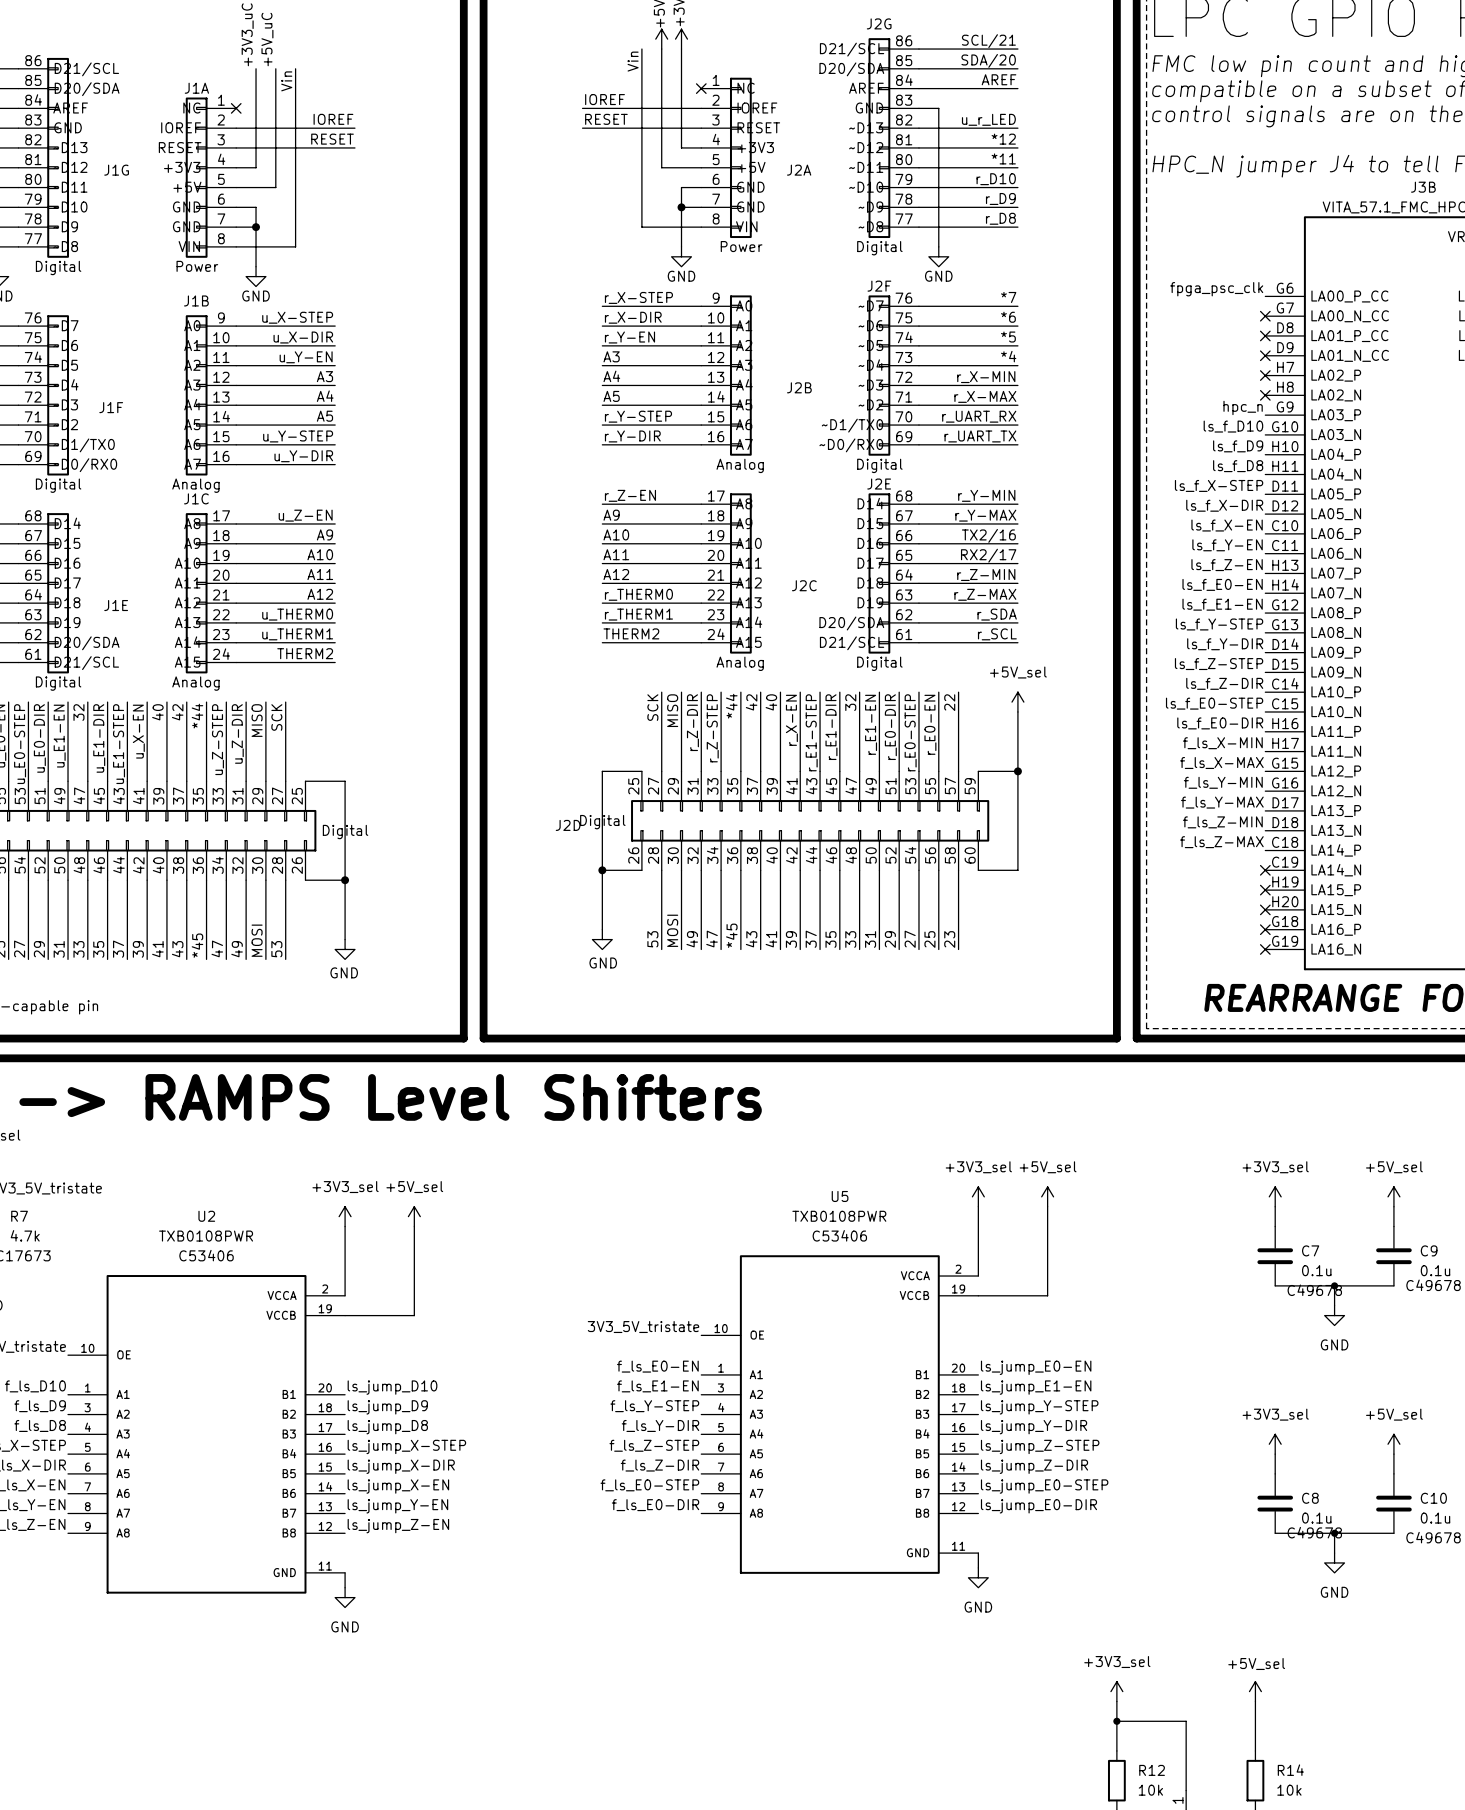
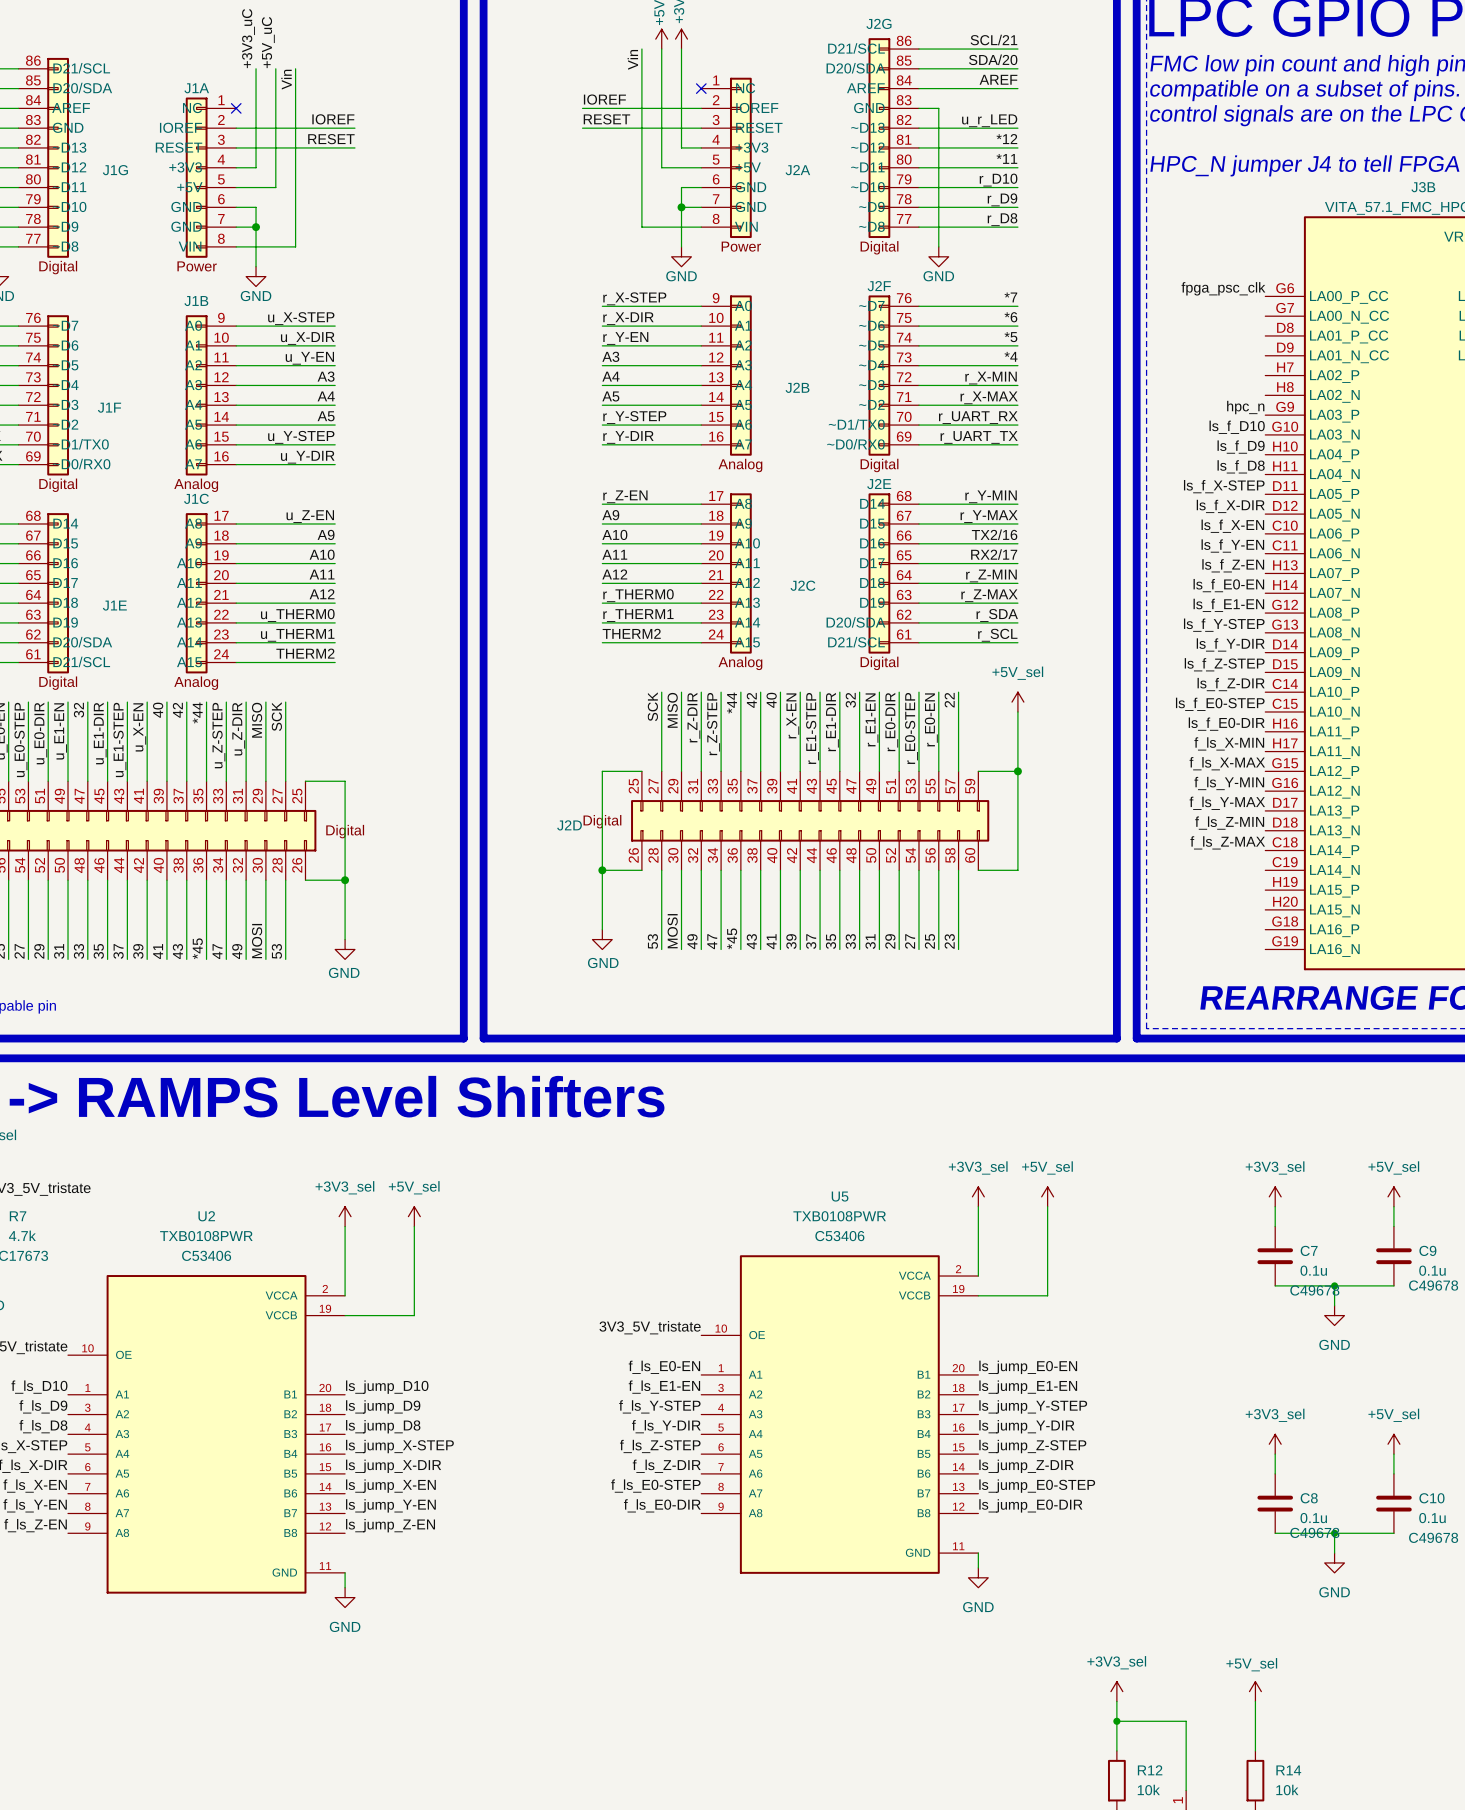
no-connect mark: (1265, 316) -> none
no-connect mark: (1265, 335) -> none
no-connect mark: (1265, 355) -> none
no-connect mark: (1265, 375) -> none
no-connect mark: (1265, 395) -> none
no-connect mark: (1265, 870) -> none
no-connect mark: (1265, 890) -> none
no-connect mark: (1265, 909) -> none
no-connect mark: (1265, 929) -> none
no-connect mark: (1265, 949) -> none

